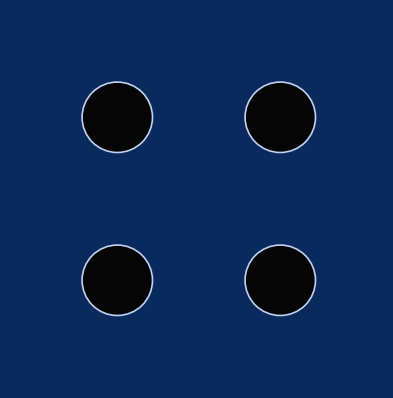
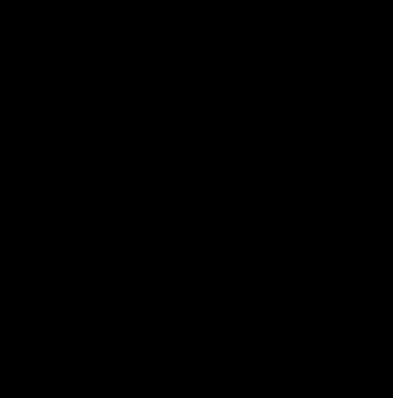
part: (117, 117) -> none
part: (280, 117) -> none
part: (117, 280) -> none
part: (280, 280) -> none

